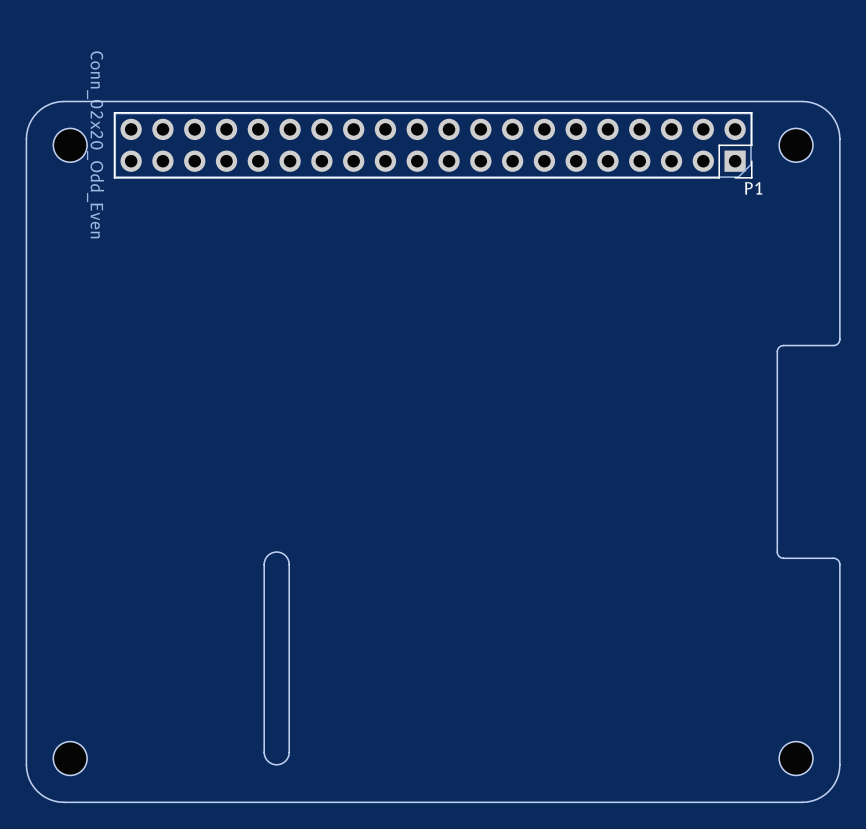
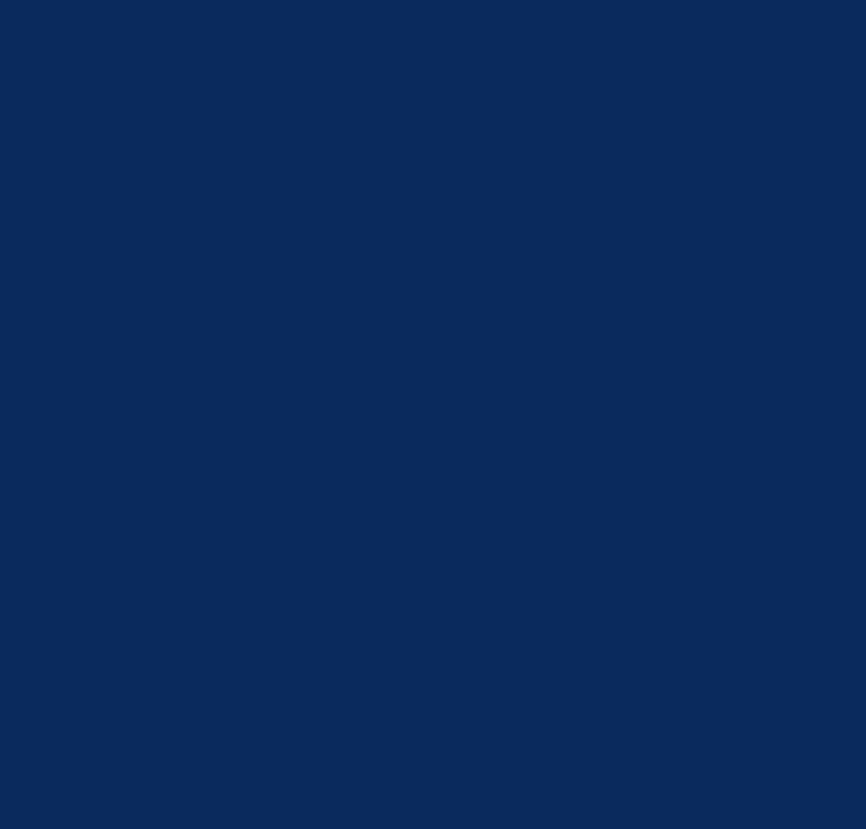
board edge: (802, 101) (63, 101) (49, 104) (37, 112) (29, 124) (26, 139) (26, 764) (29, 779) (37, 791) (49, 799) (63, 802) (802, 802) (816, 799) (828, 791) (837, 779) (839, 764) (839, 562) (834, 558) (782, 558) (779, 556) (777, 552) (777, 350) (782, 345) (834, 345) (838, 343) (839, 339) (839, 134) (834, 120) (825, 109) (816, 104) (802, 101) -> none
part: (70, 145) -> none
P1: Conn_02x20_Odd_Even (433, 145) -> none
part: (796, 145) -> none
board edge: (289, 564) (289, 753) (284, 762) (275, 764) (266, 759) (264, 752) (264, 562) (269, 554) (278, 552) (286, 556) (289, 564) -> none
part: (70, 758) -> none
part: (796, 758) -> none

